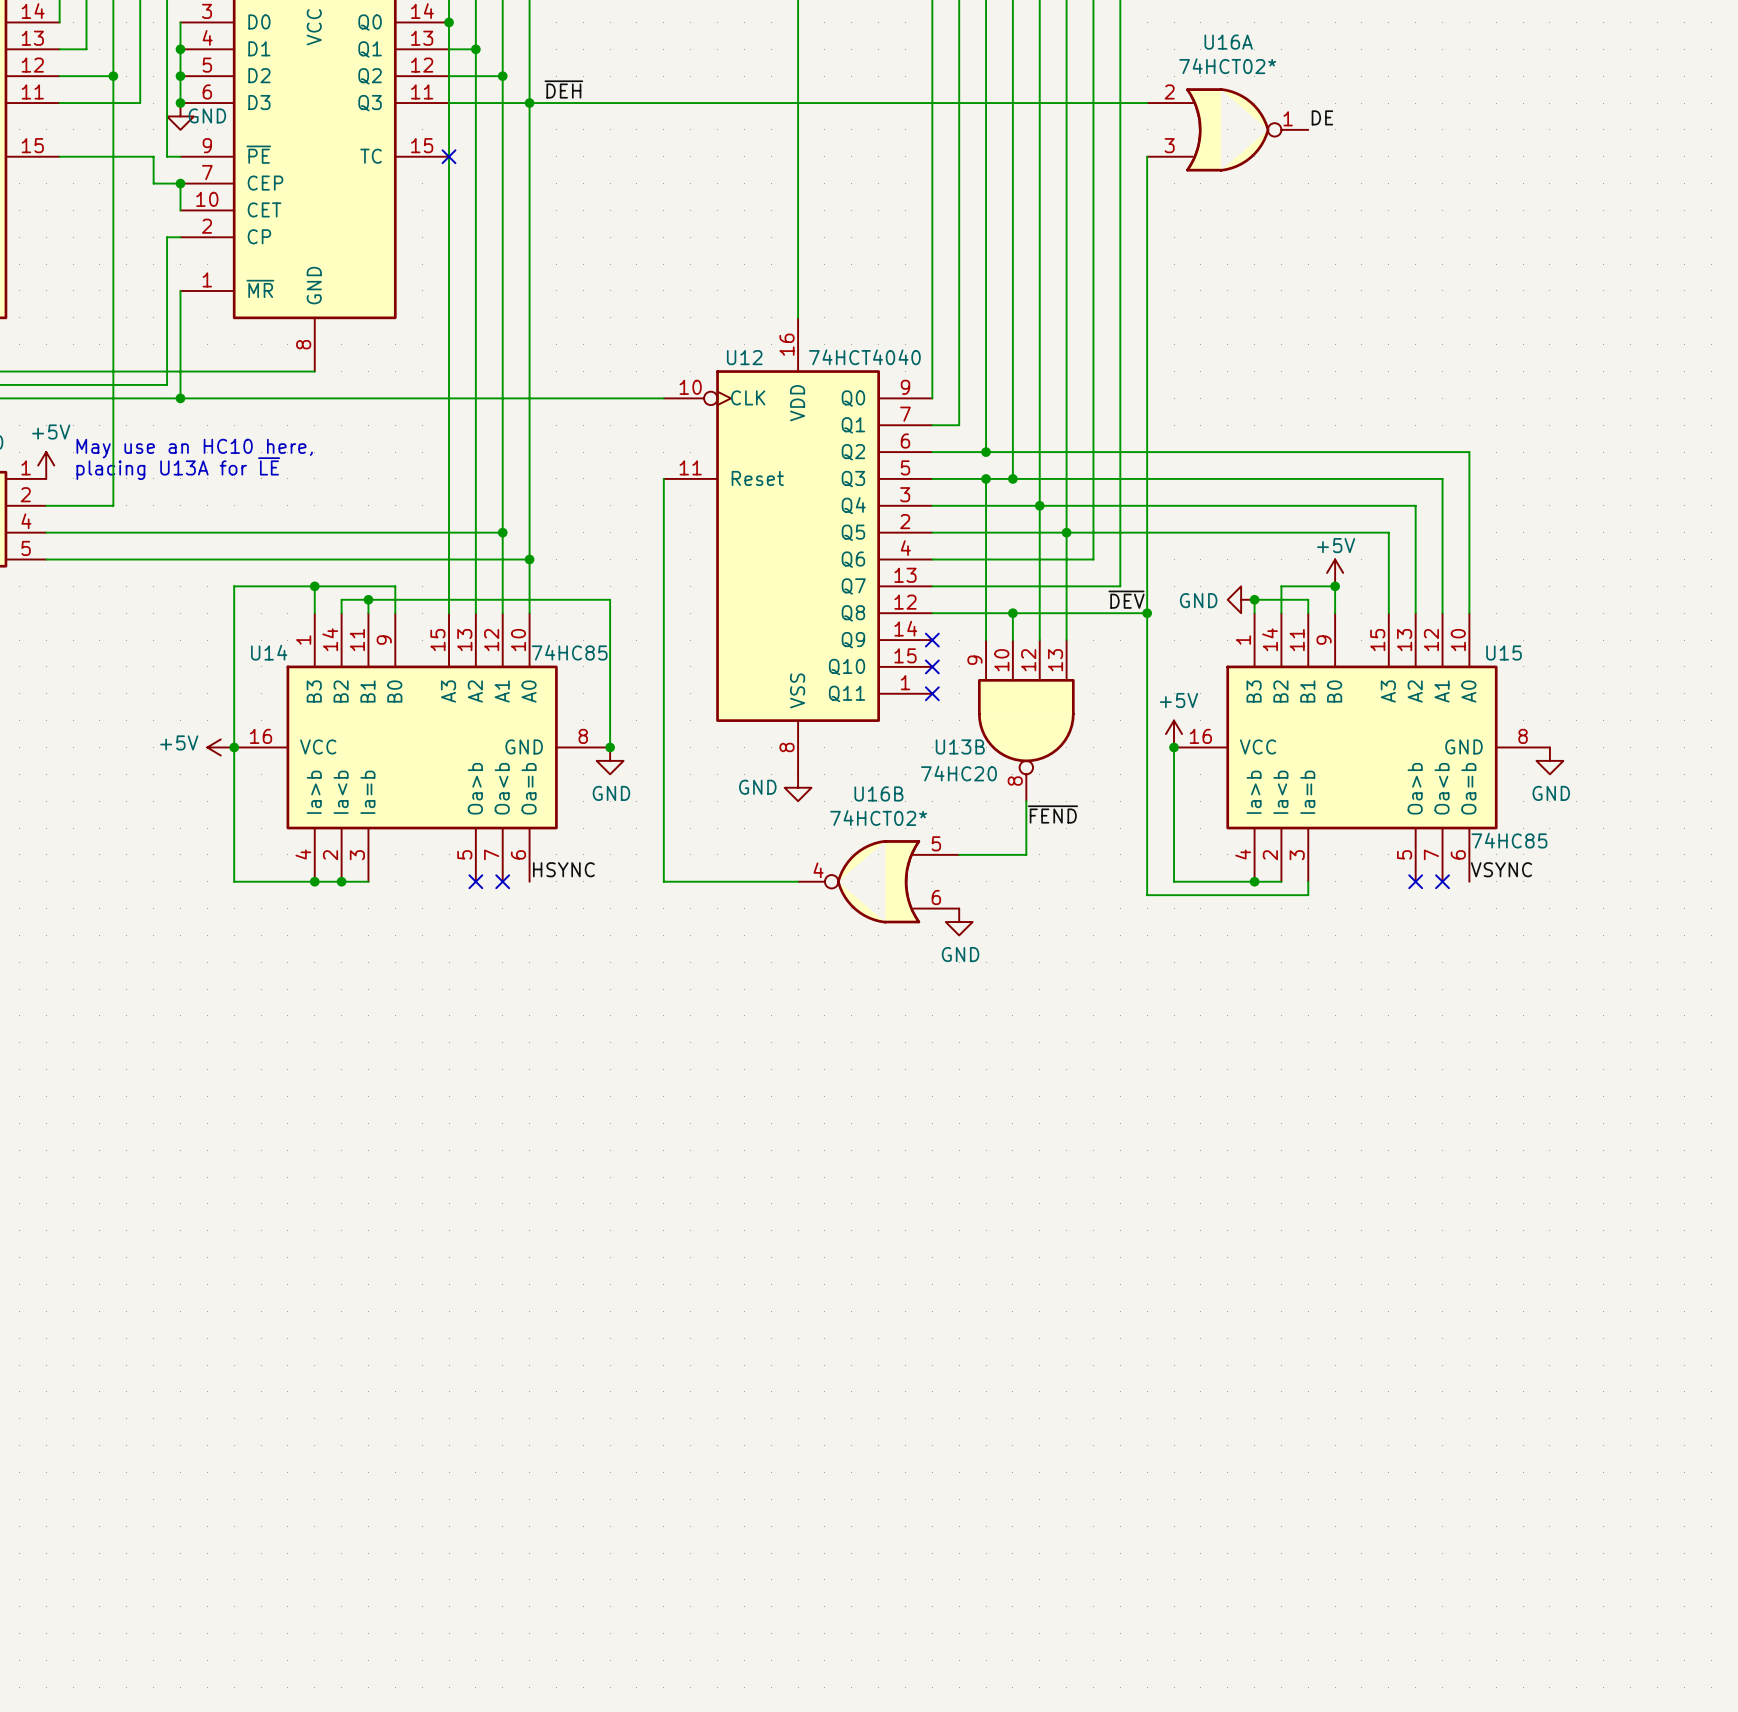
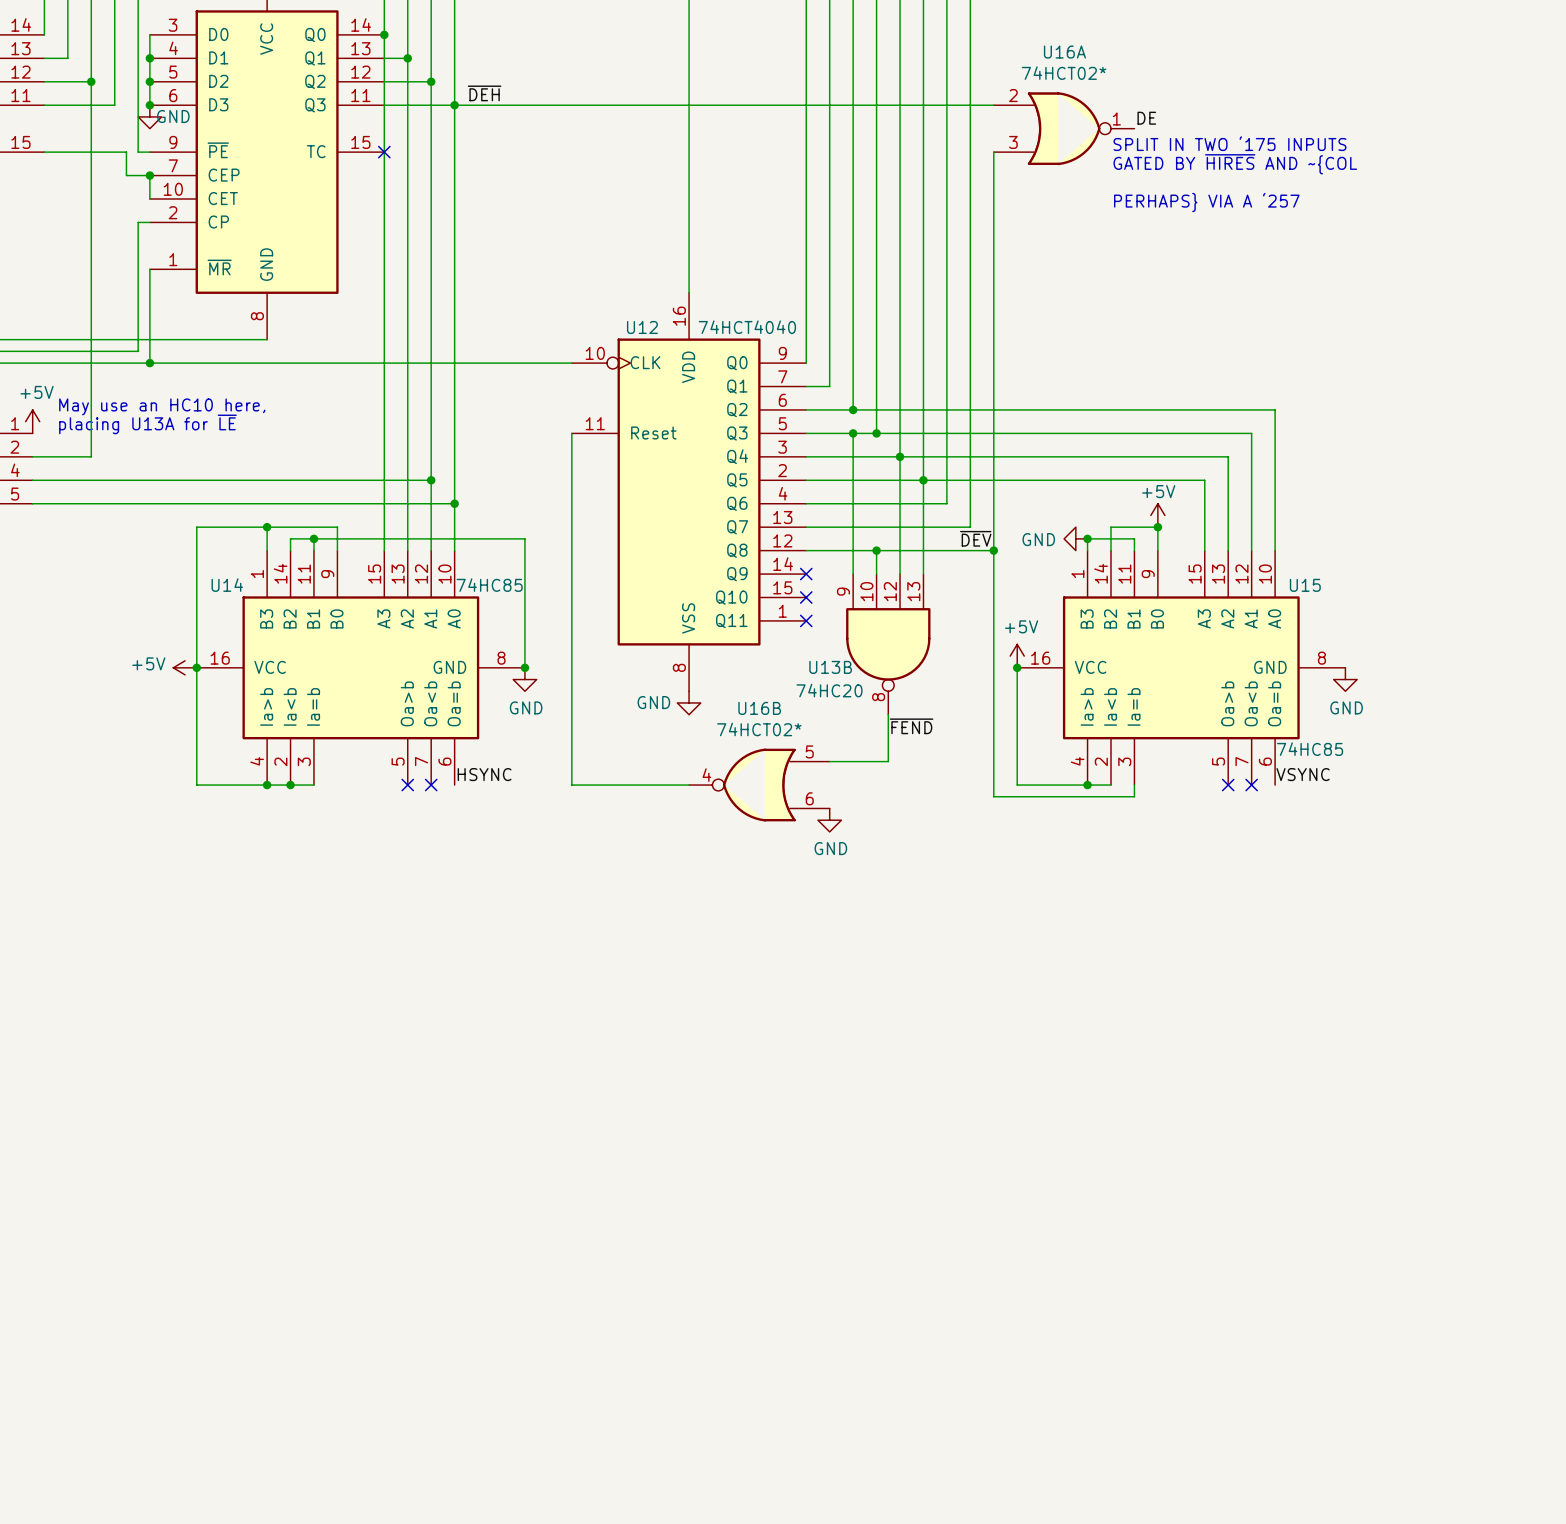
text: none -> SPLIT IN TWO ‘175 INPUTS (1229, 143)
text: none -> GATED BY ~{HIRES} AND ~{COL (1235, 164)
text: none -> PERHAPS} VIA A ‘257 (1206, 202)

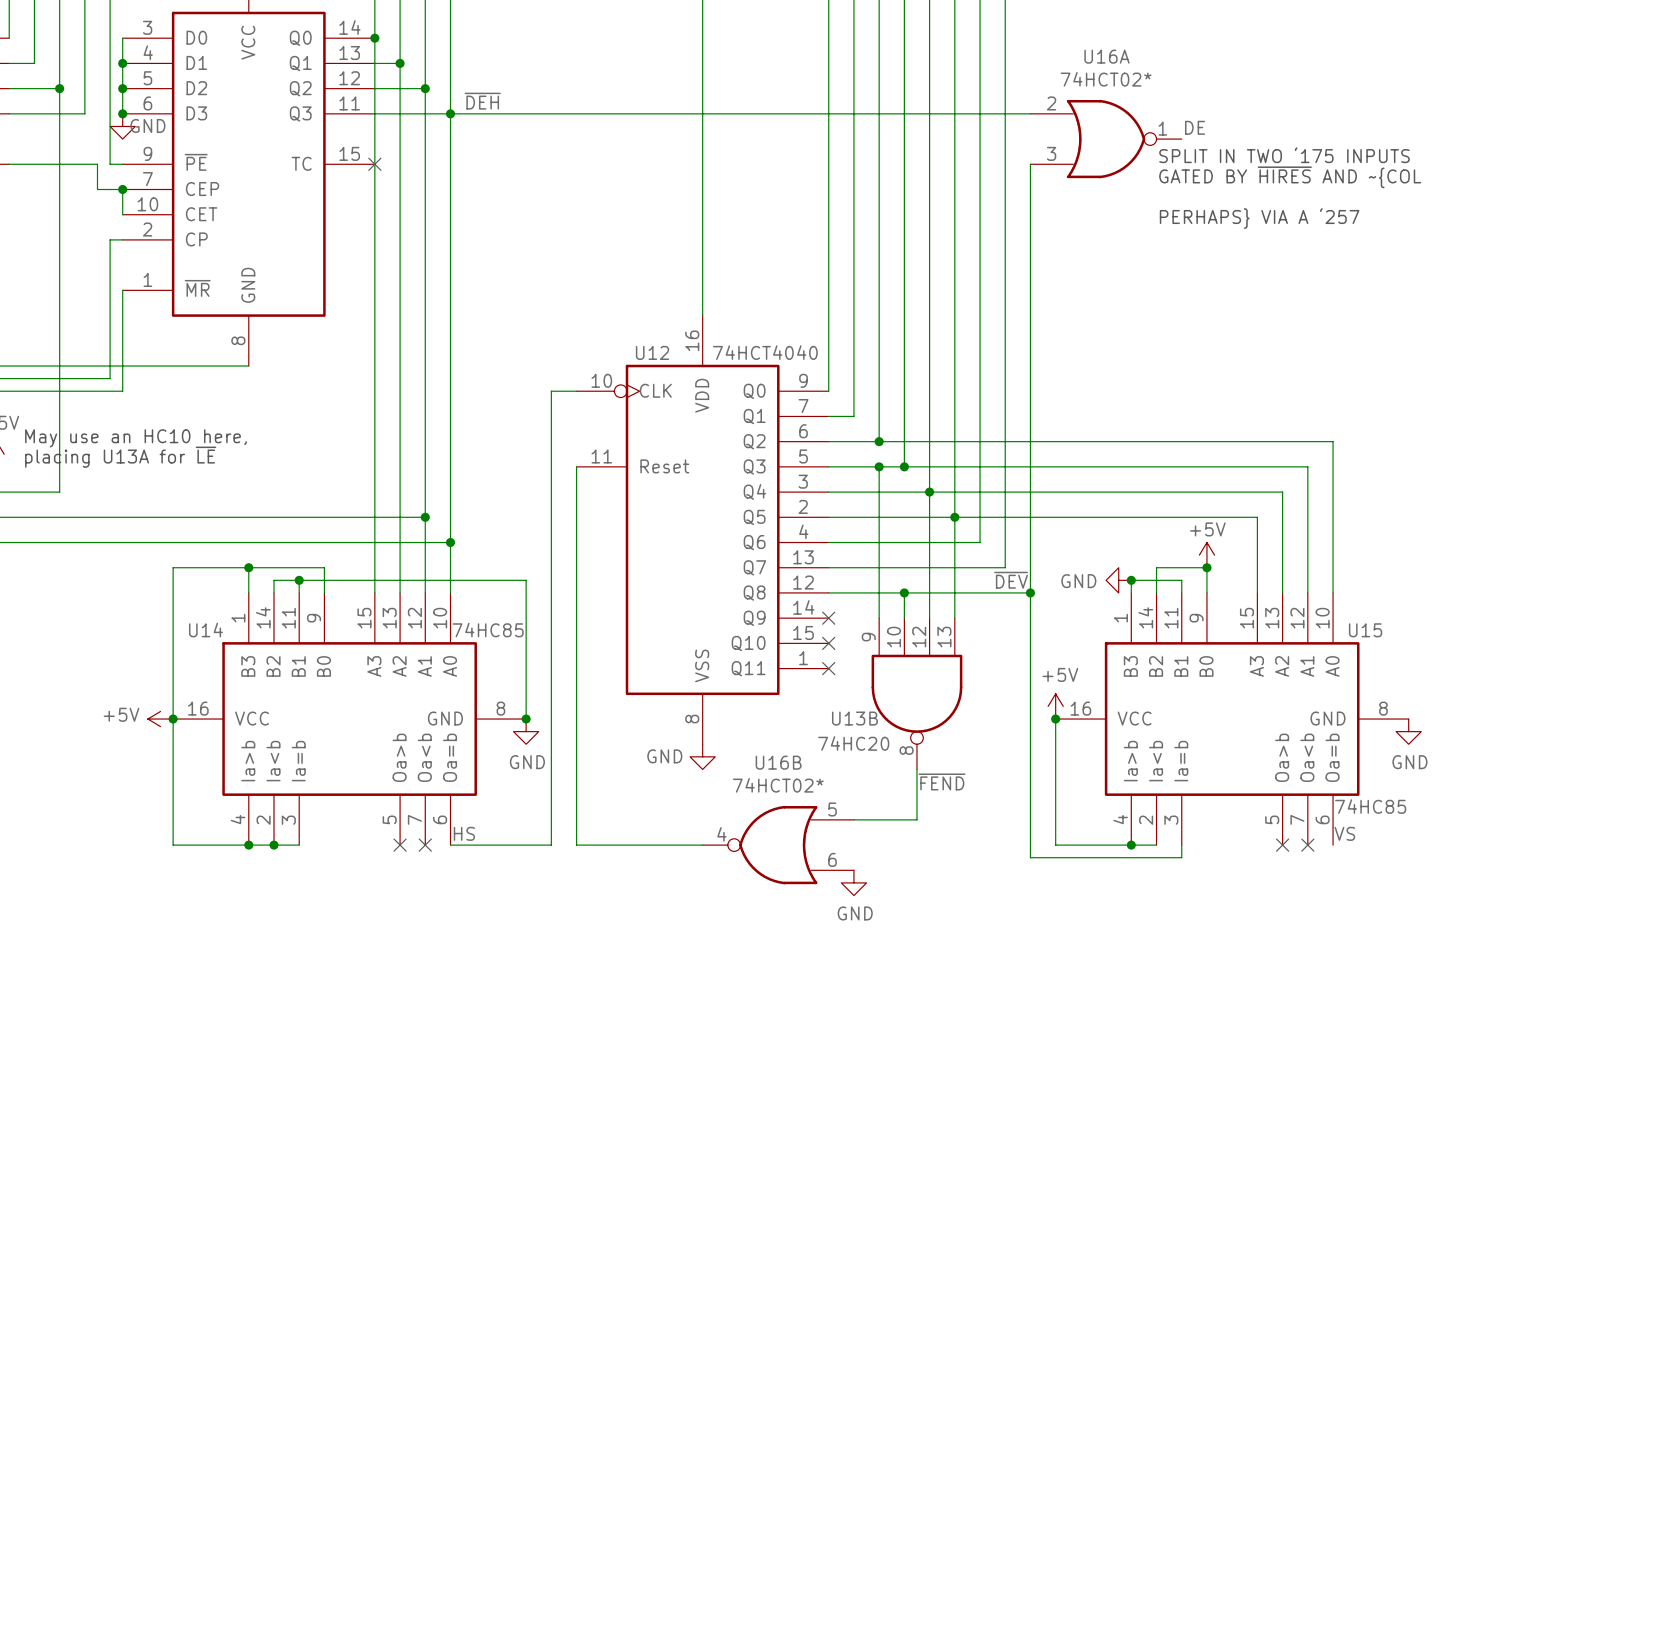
wire: (149, 363) (548, 363) -> (450, 845) (551, 845) (551, 391)
junction: (149, 363) -> none
label: HSYNC (484, 774) -> HS (464, 833)
label: VSYNC (1303, 774) -> VS (1344, 833)

